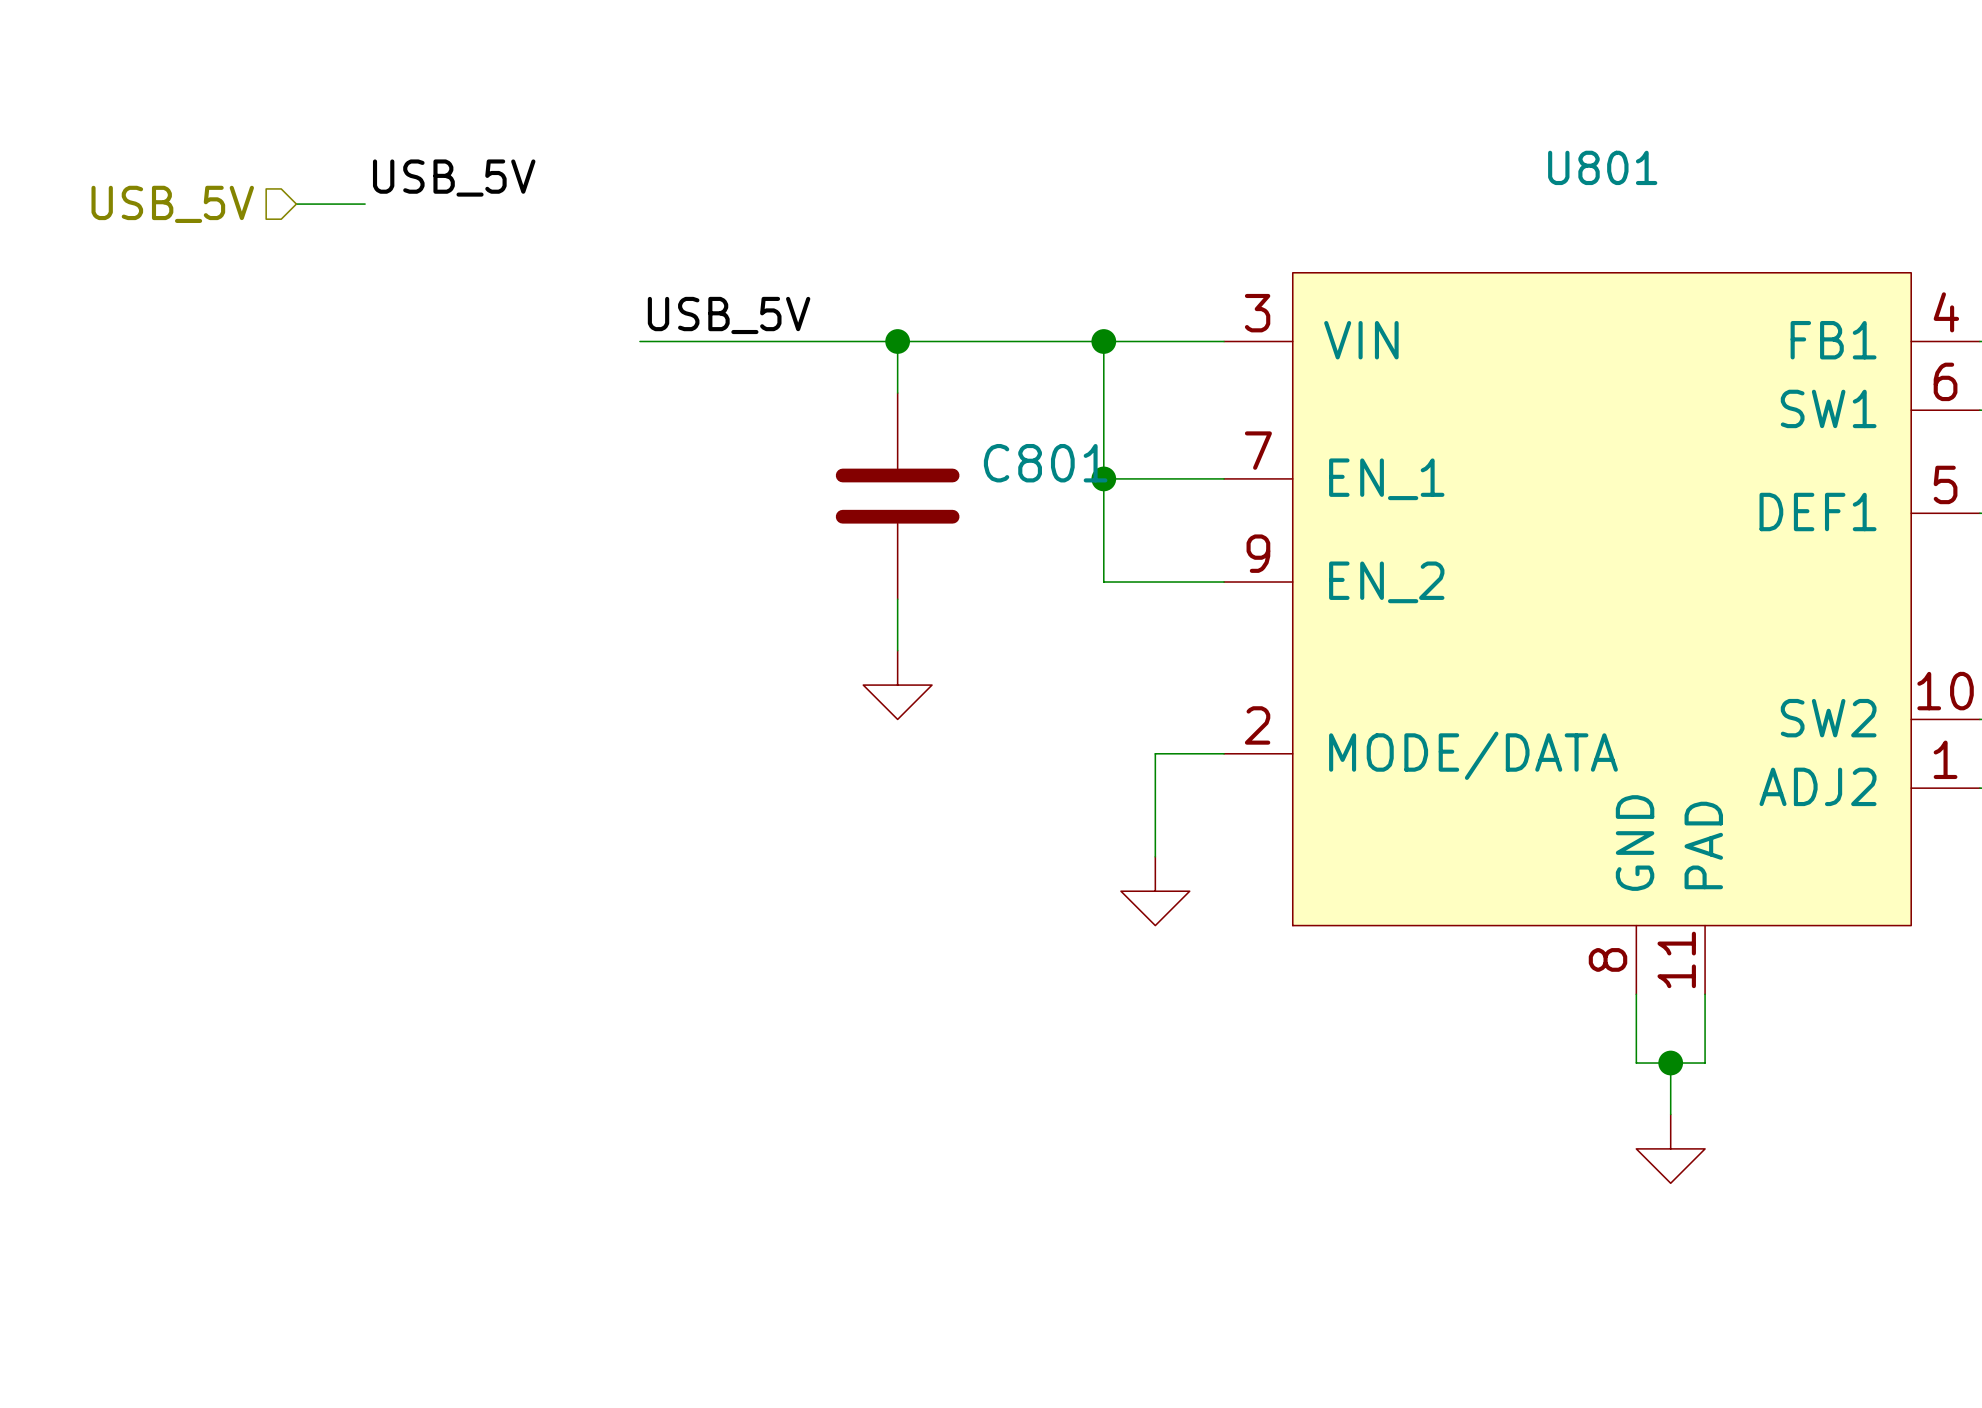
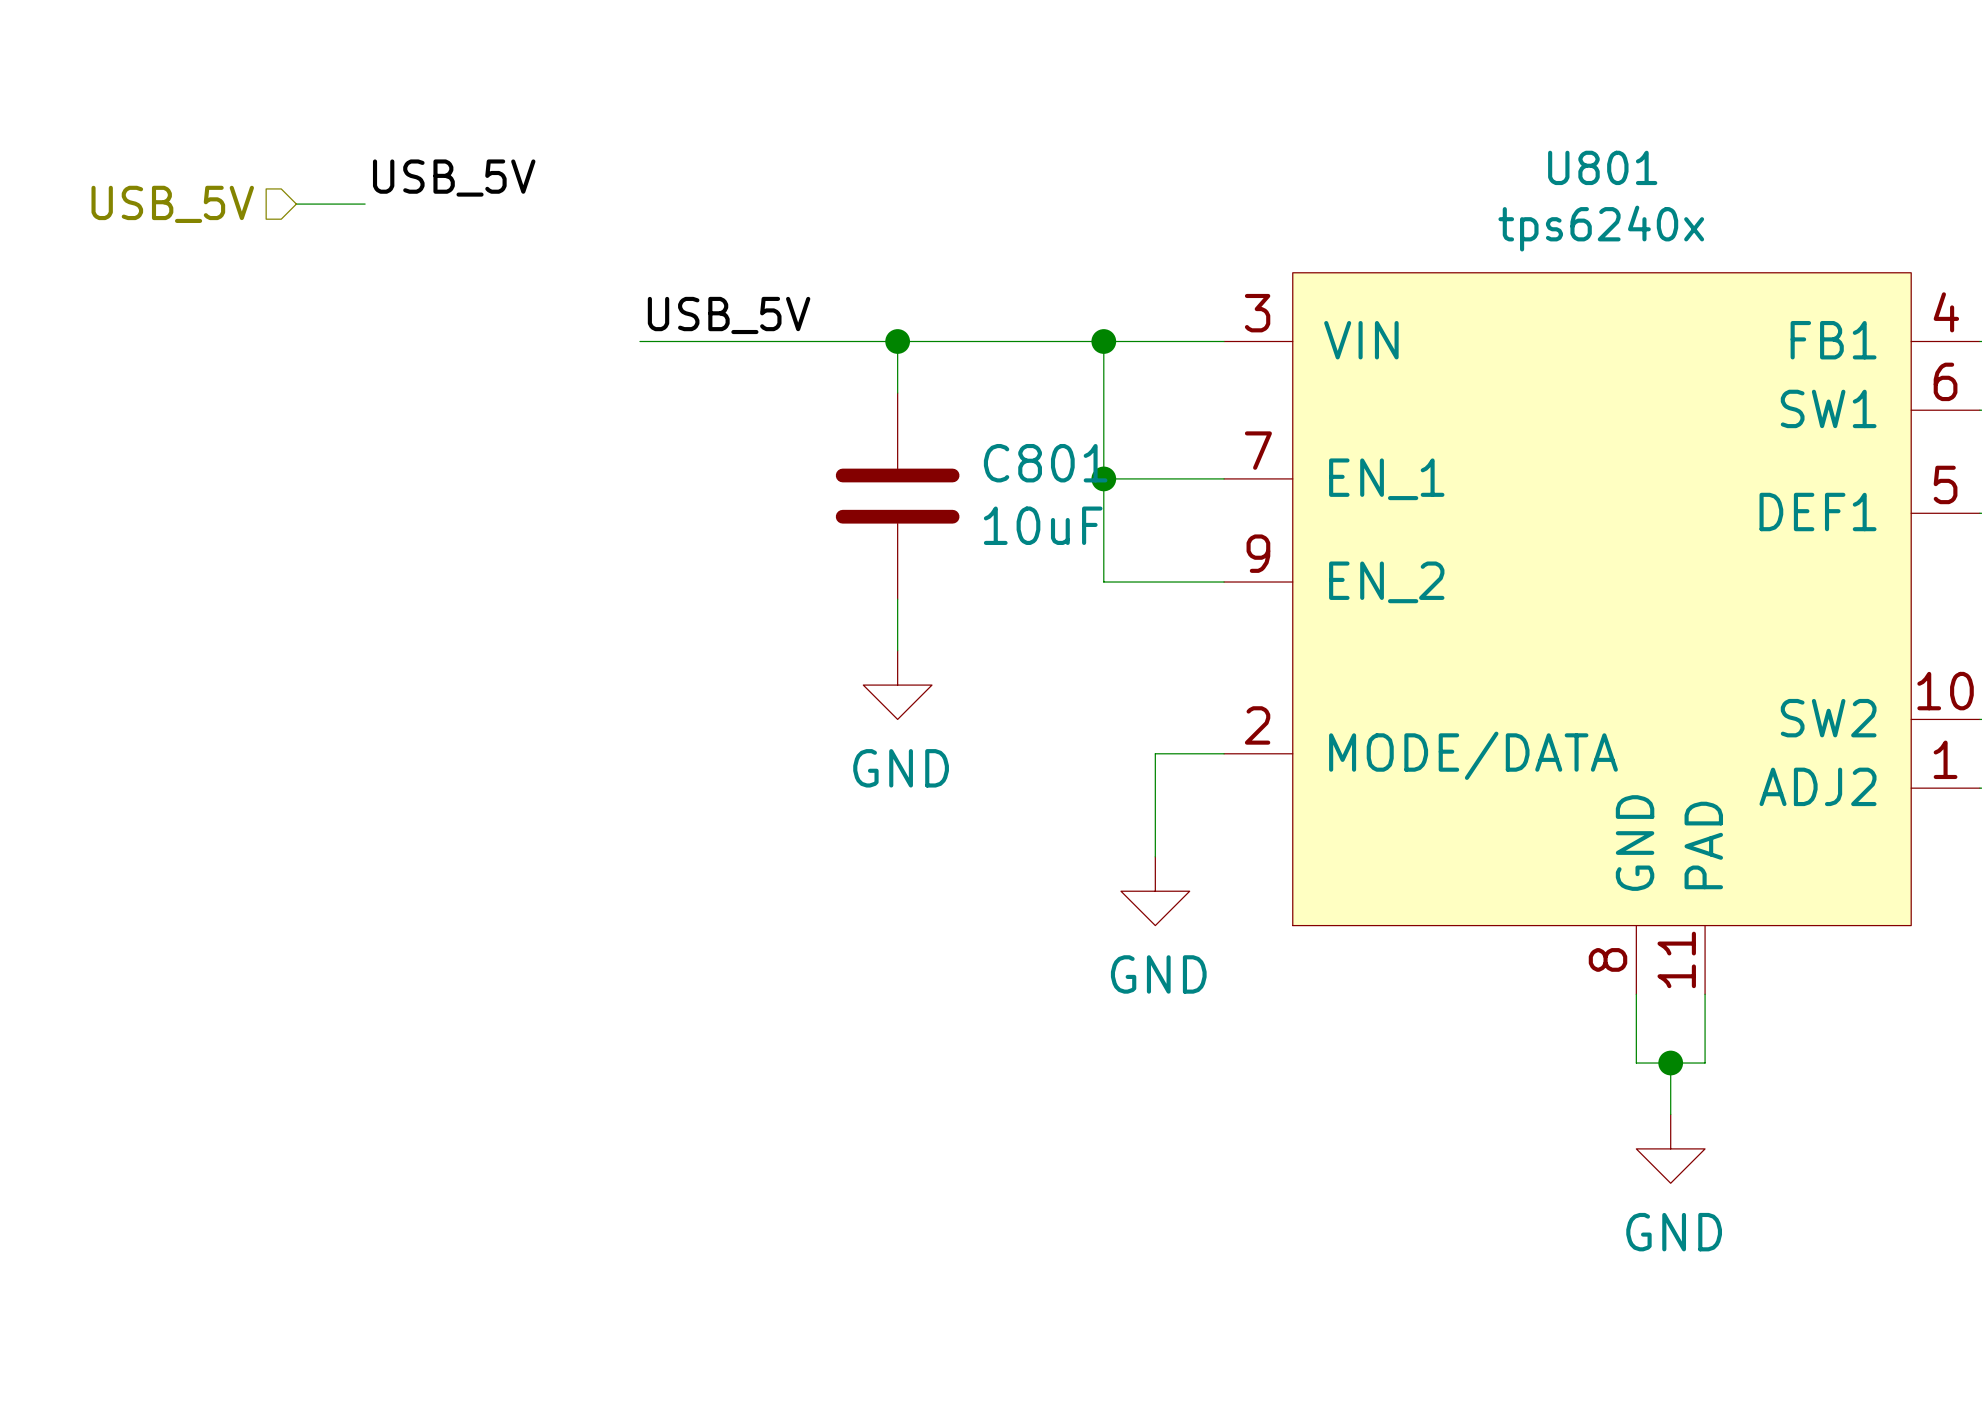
U801 value: none -> tps6240x (1601, 228)
C801 value: none -> 10uF (1043, 525)
power symbol text: none -> GND (901, 768)
power symbol text: none -> GND (1158, 974)
power symbol text: none -> GND (1674, 1232)

